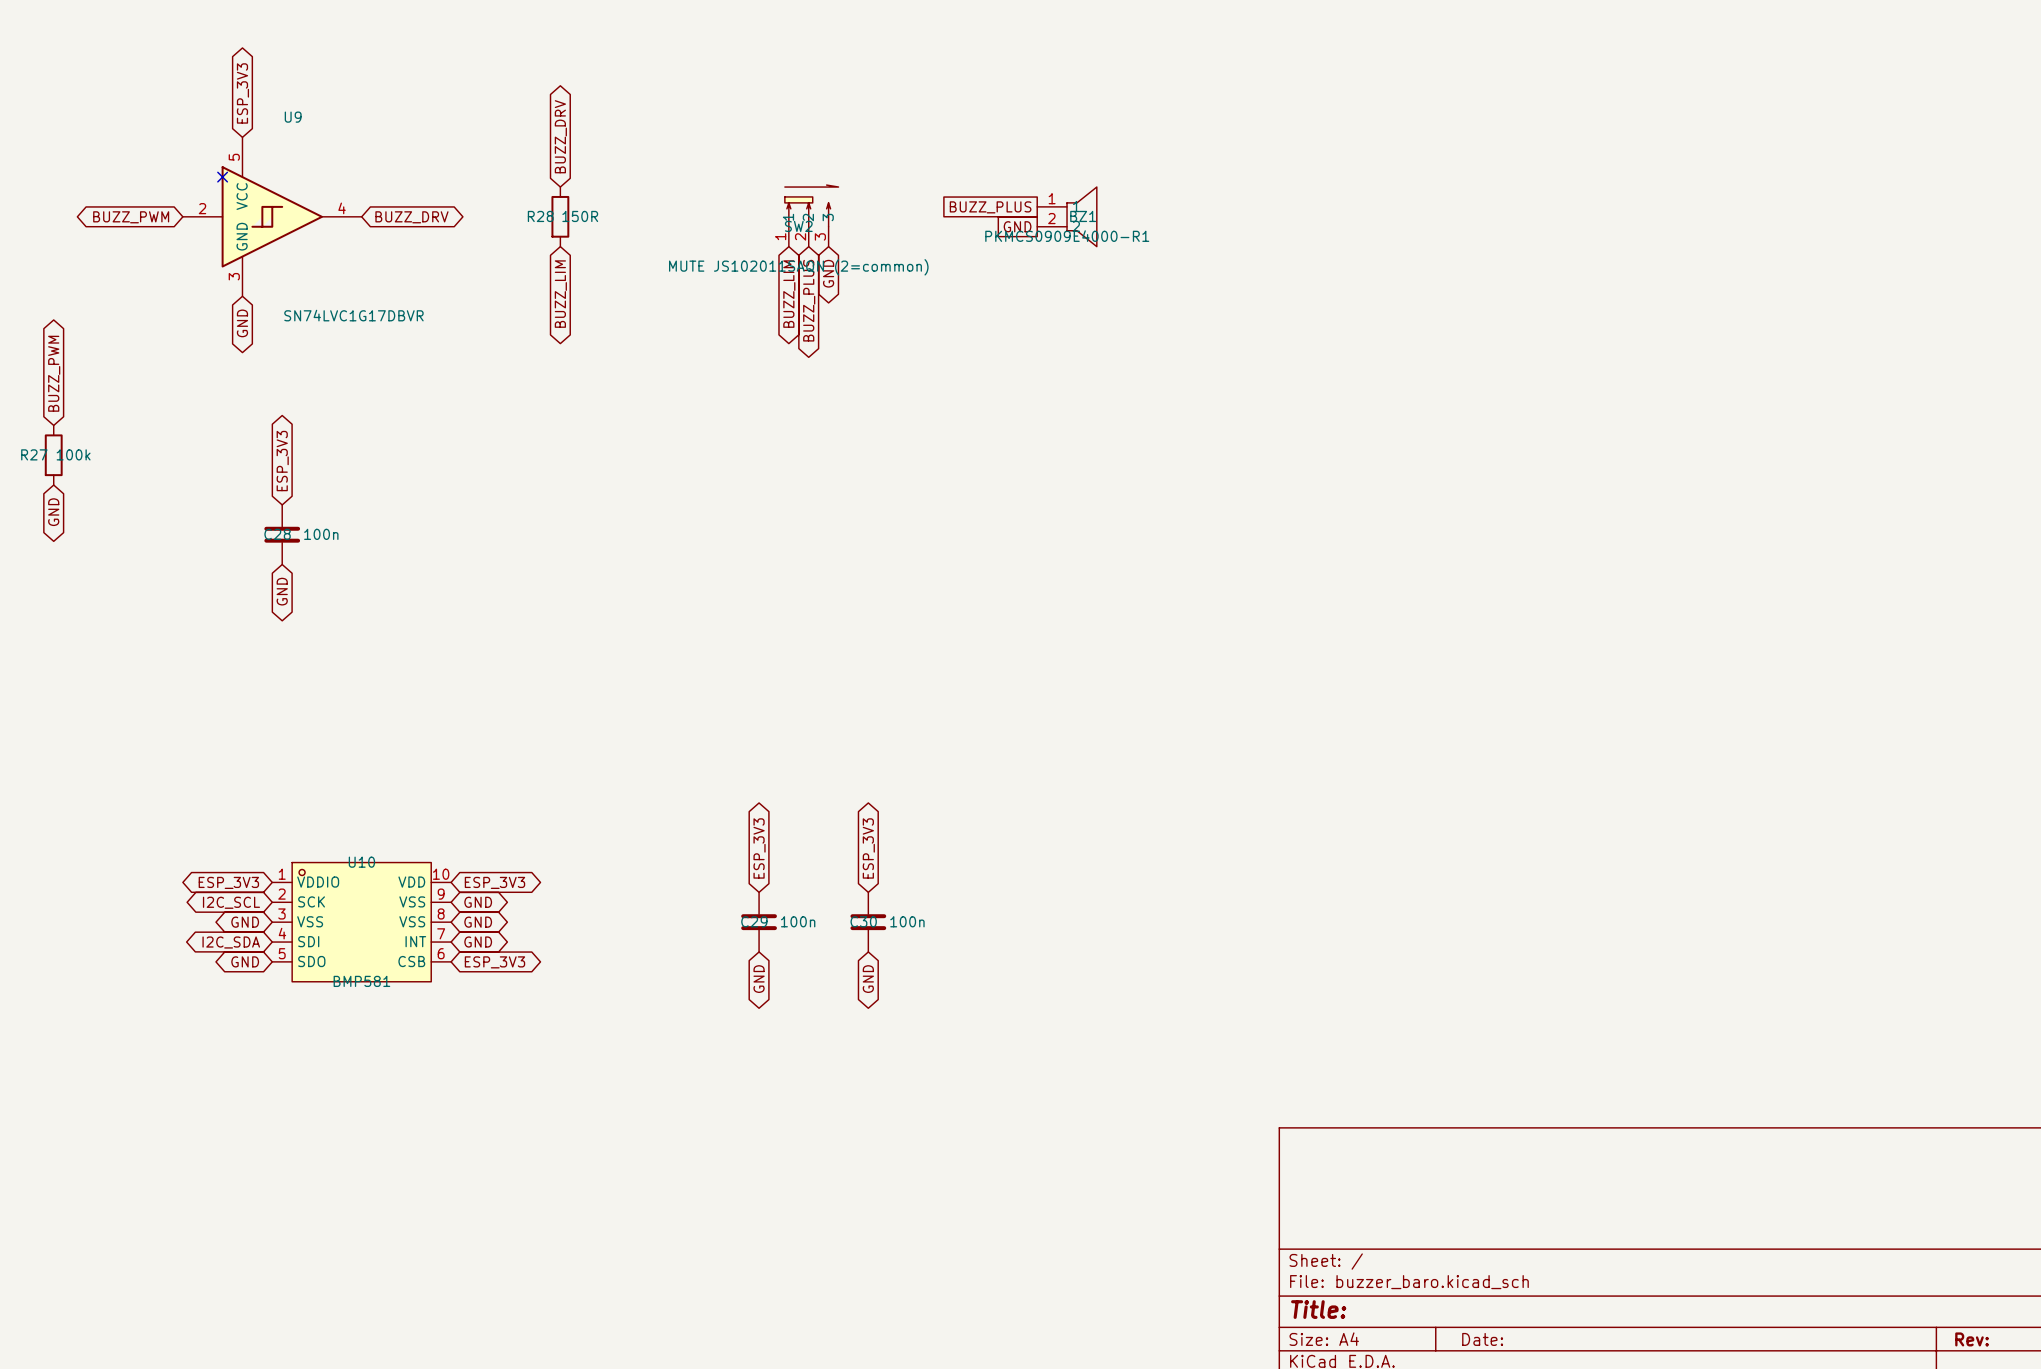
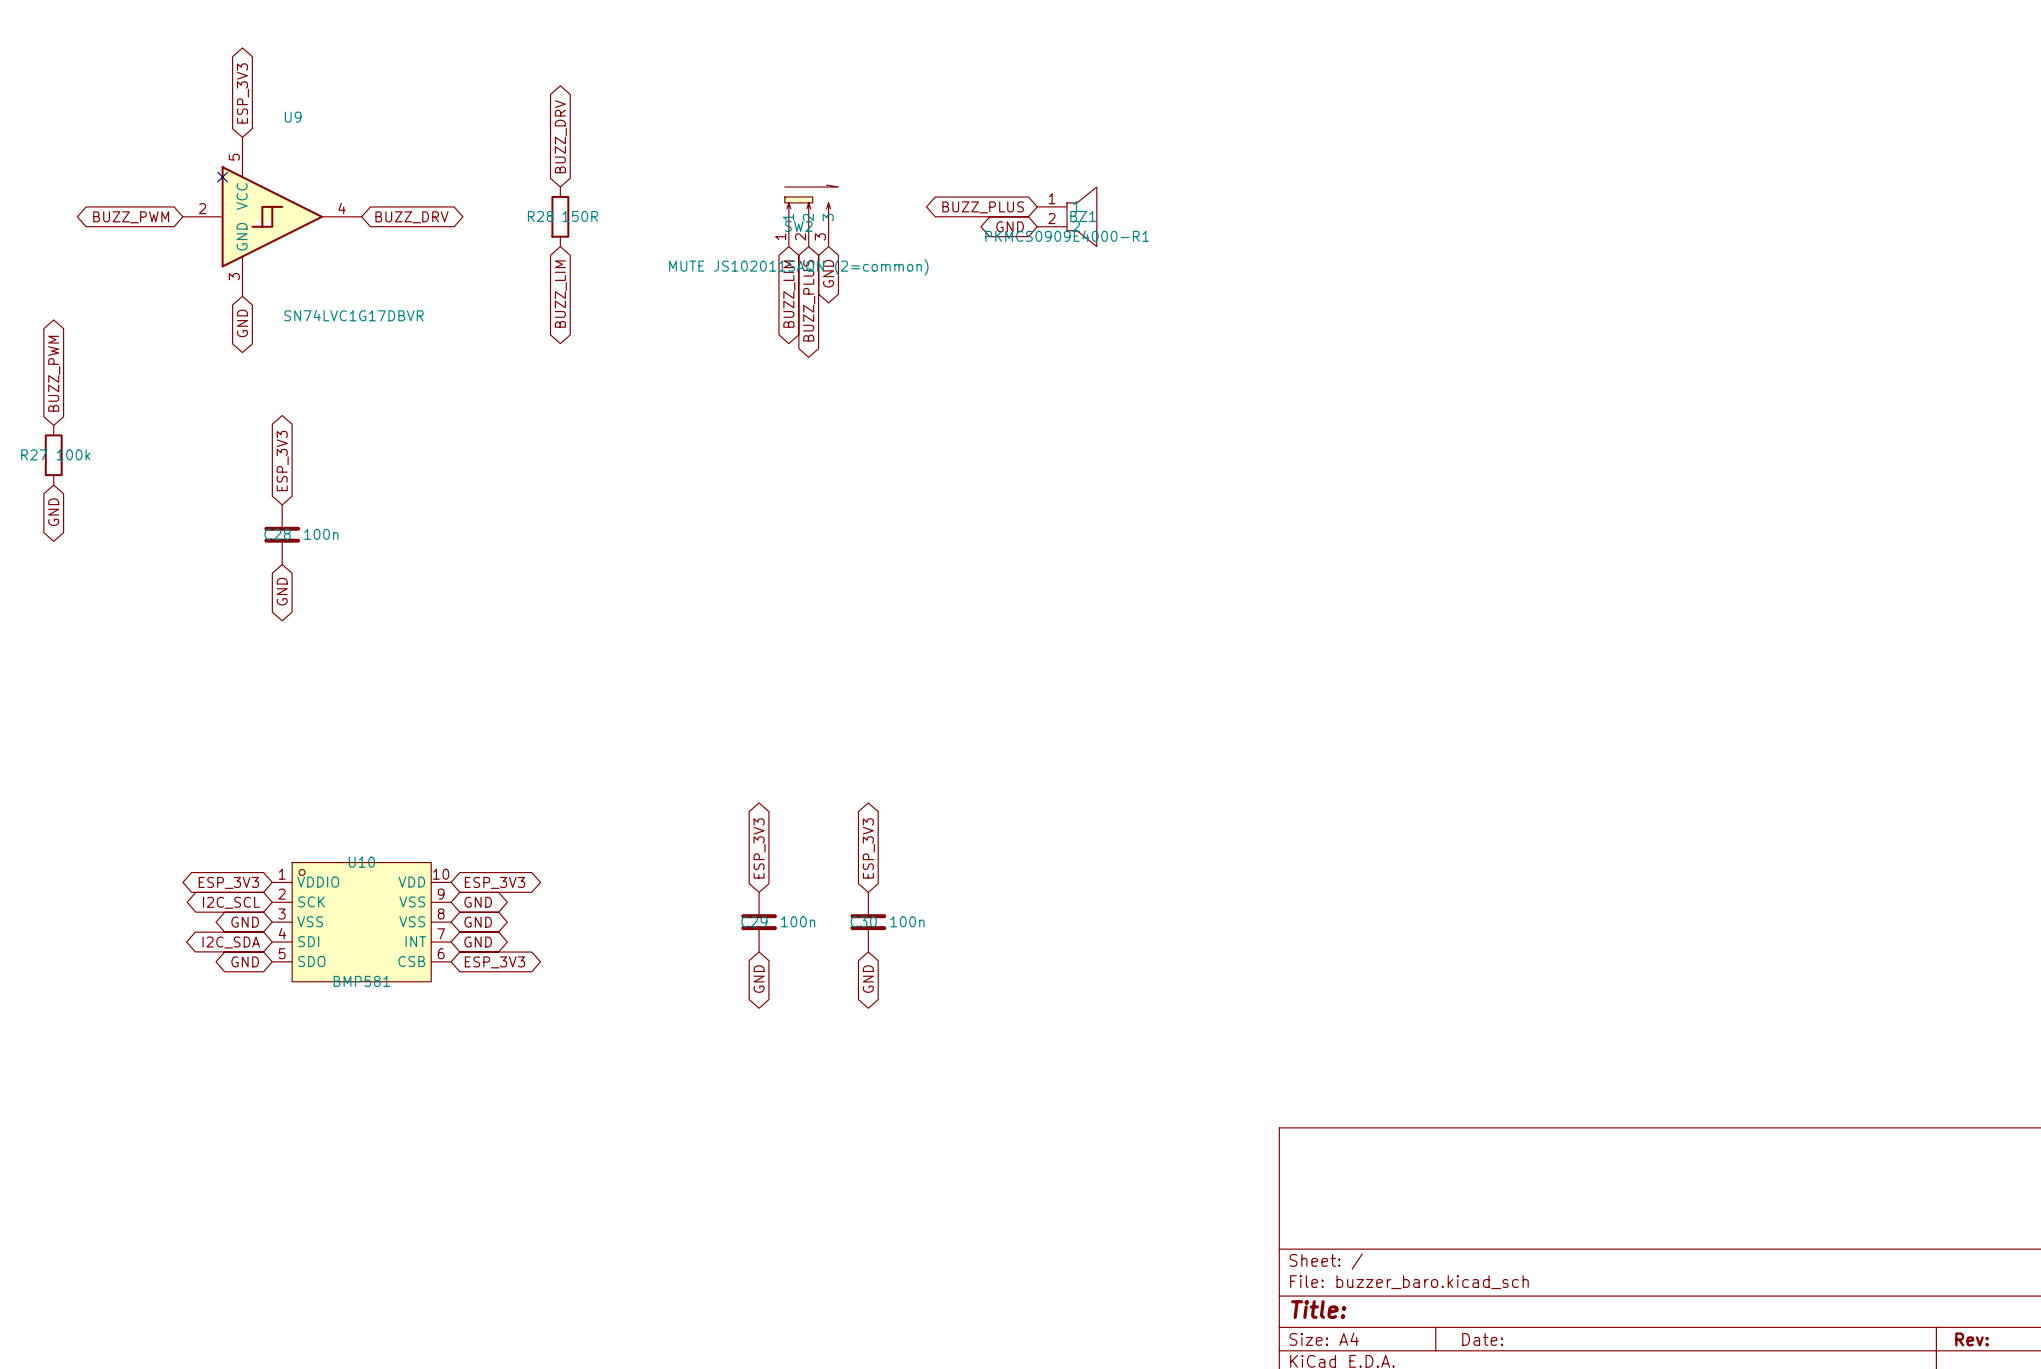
global label shape: passive (990, 207) -> bidirectional (983, 207)
global label shape: passive (1017, 226) -> bidirectional (1010, 226)

